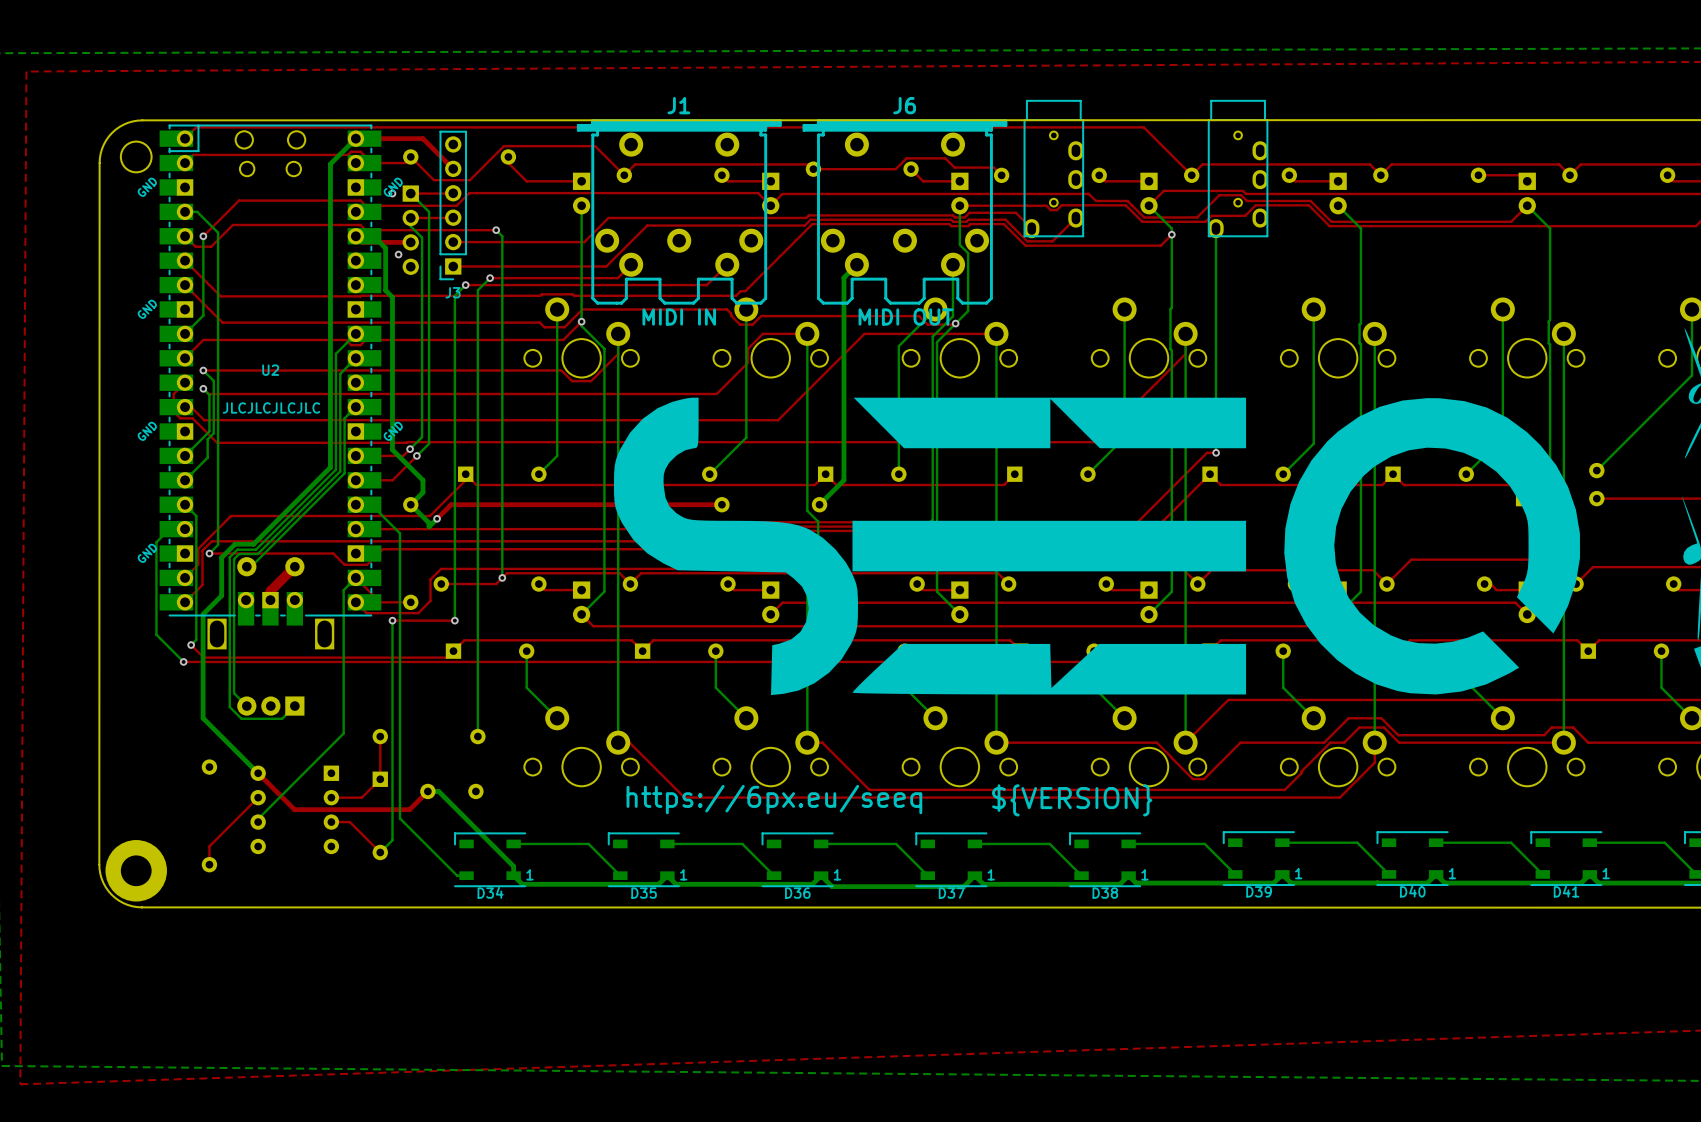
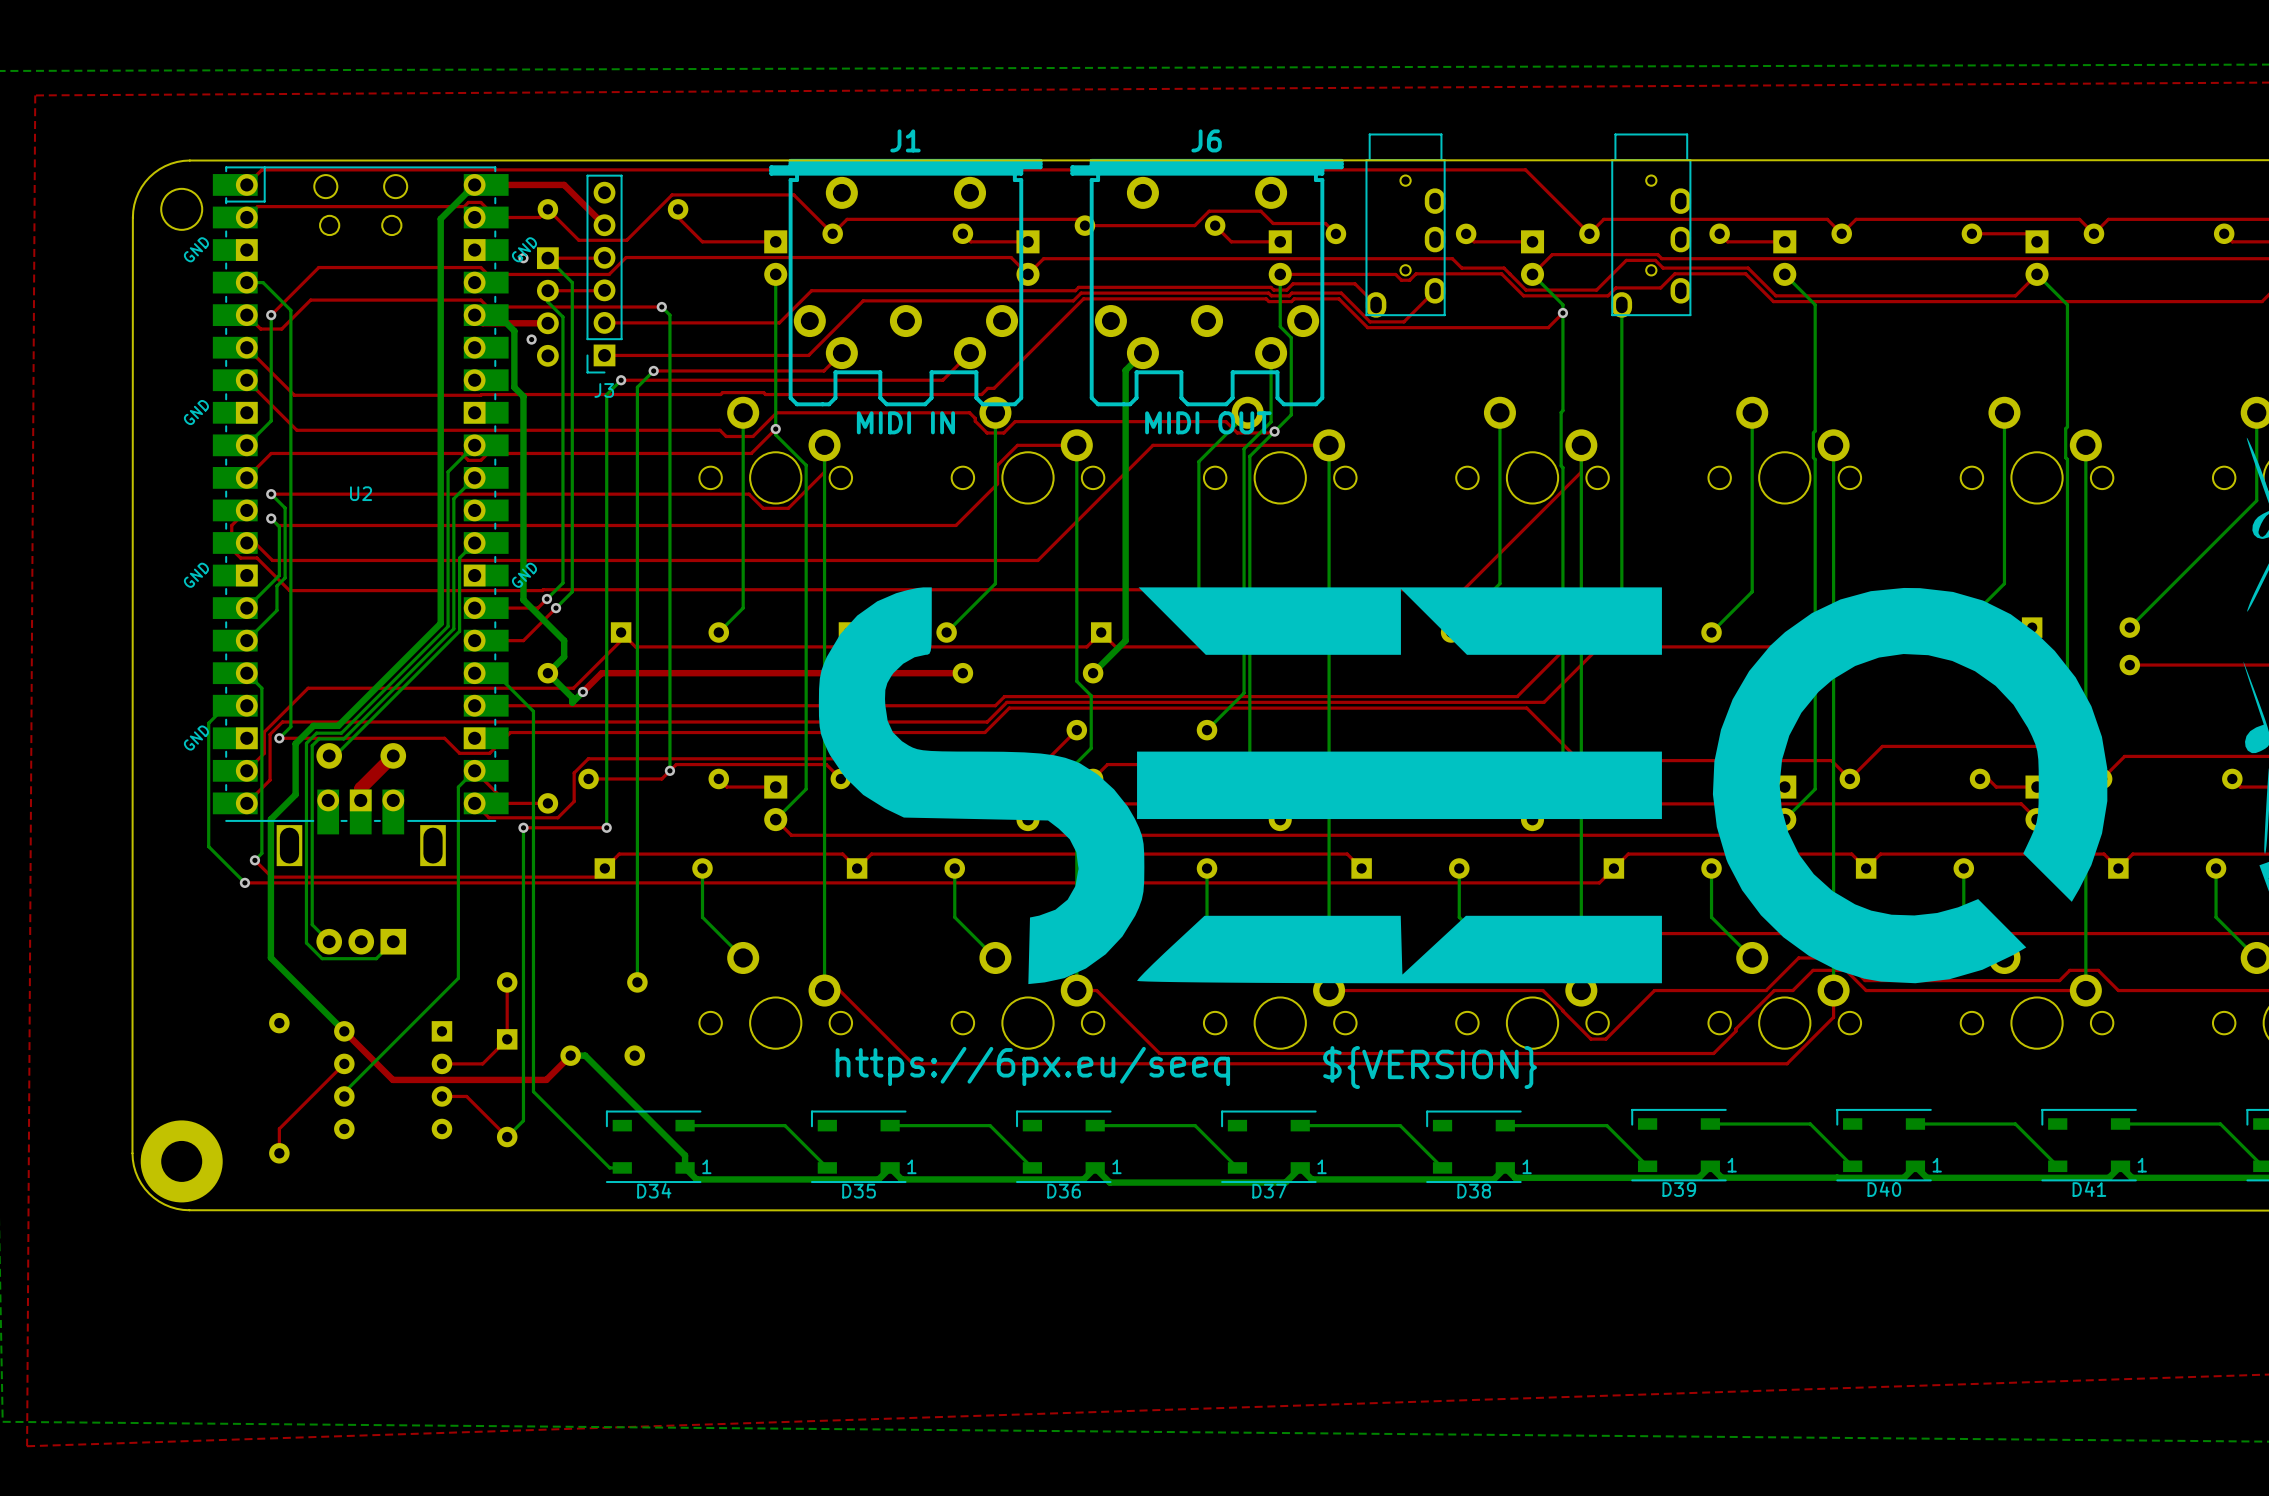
text: JLCJLCJLCJLC (271, 407) -> none
part position: (1096, 546) -> (1463, 785)

